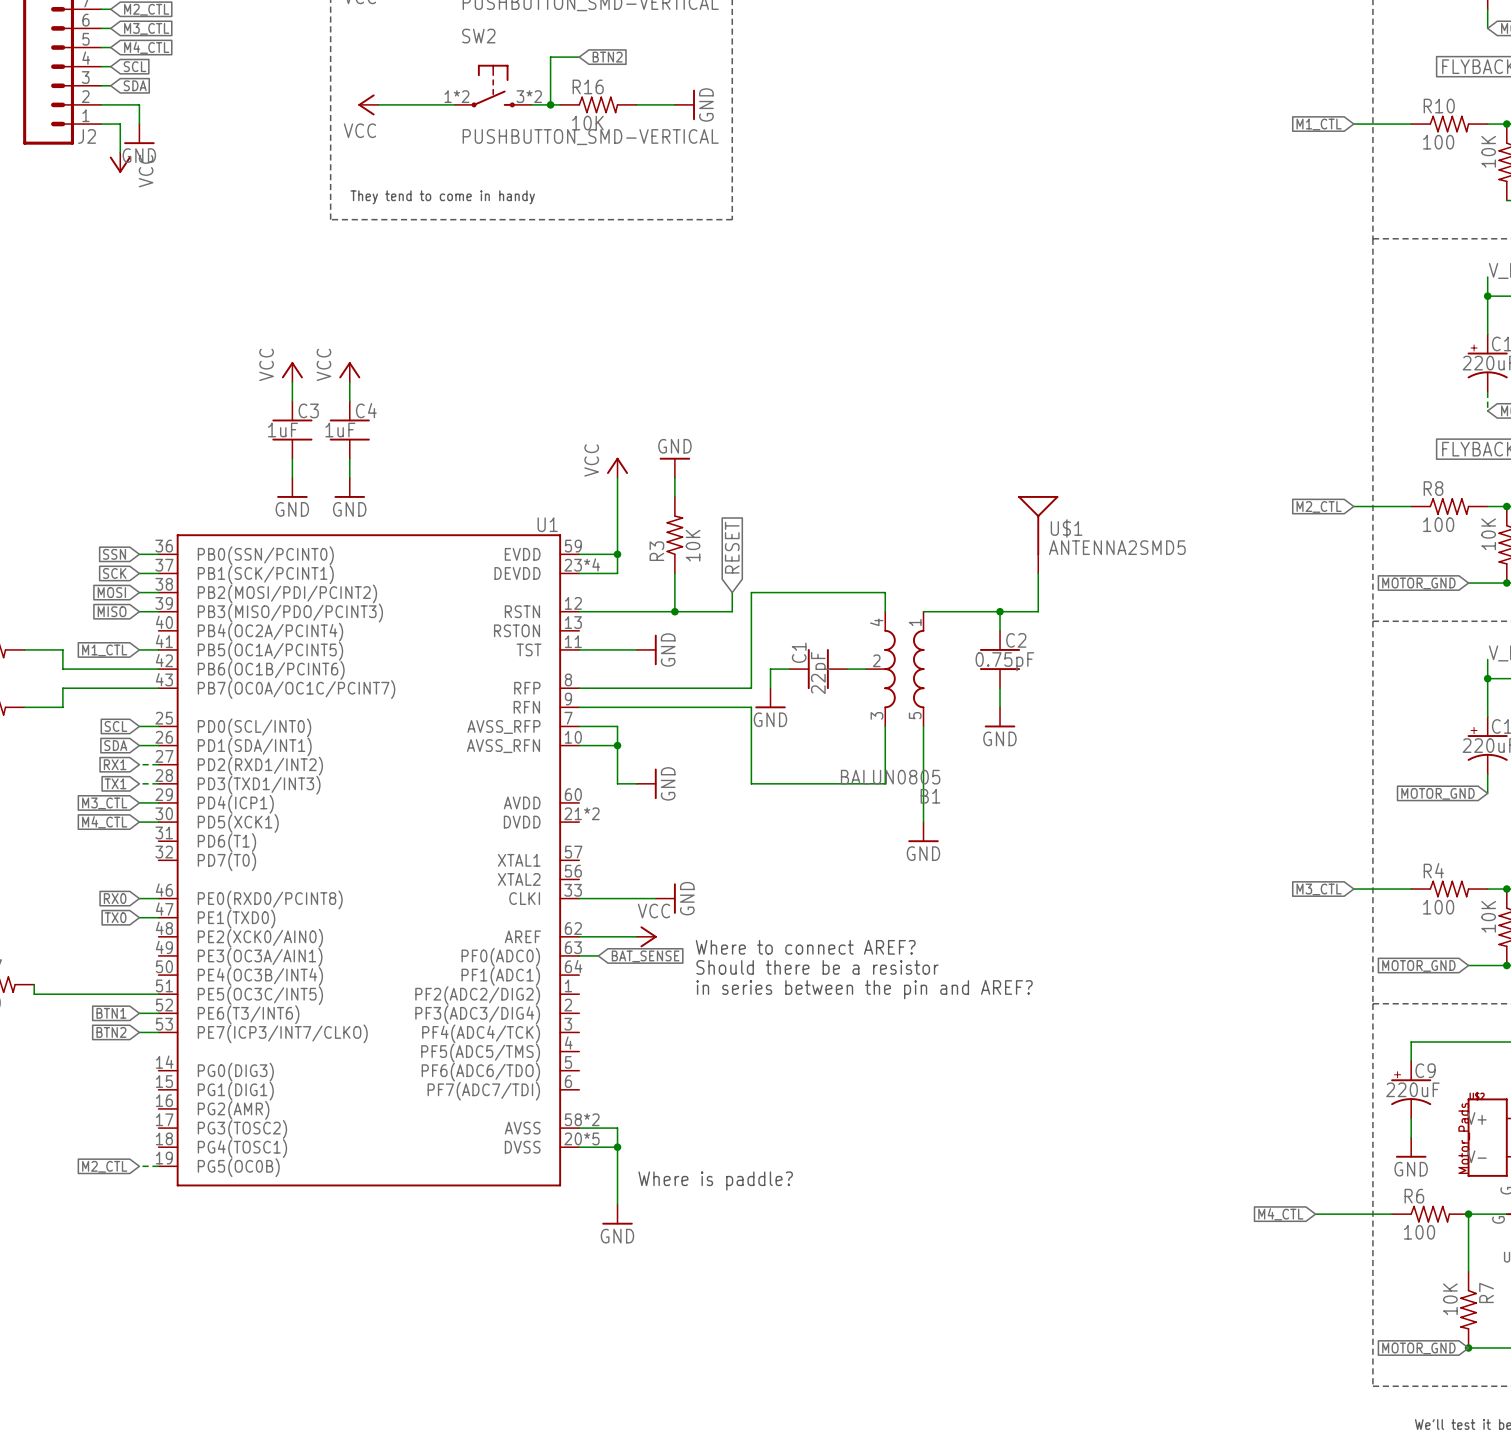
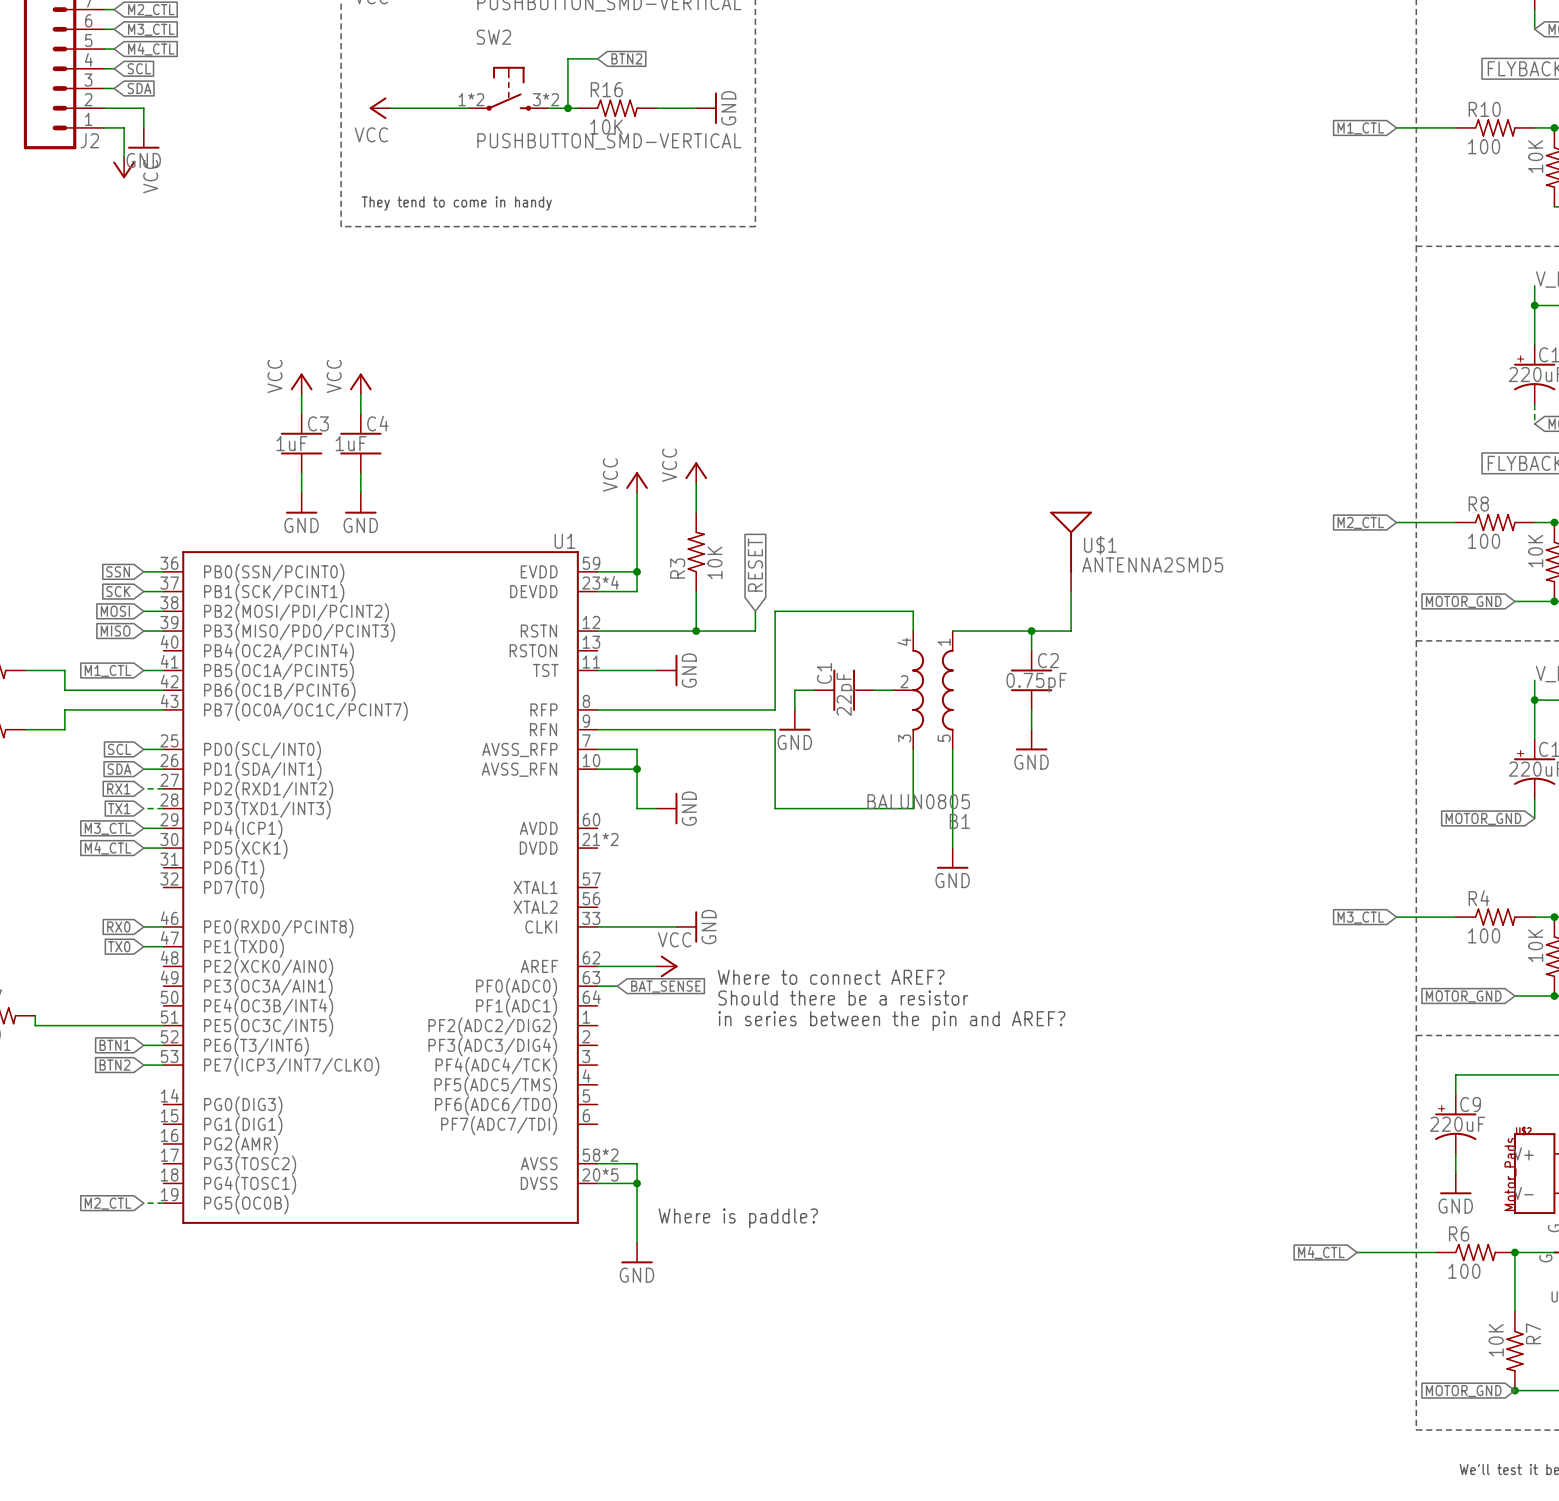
power symbol: none -> VCC (696, 472)
power symbol: GND (674, 467) -> none

